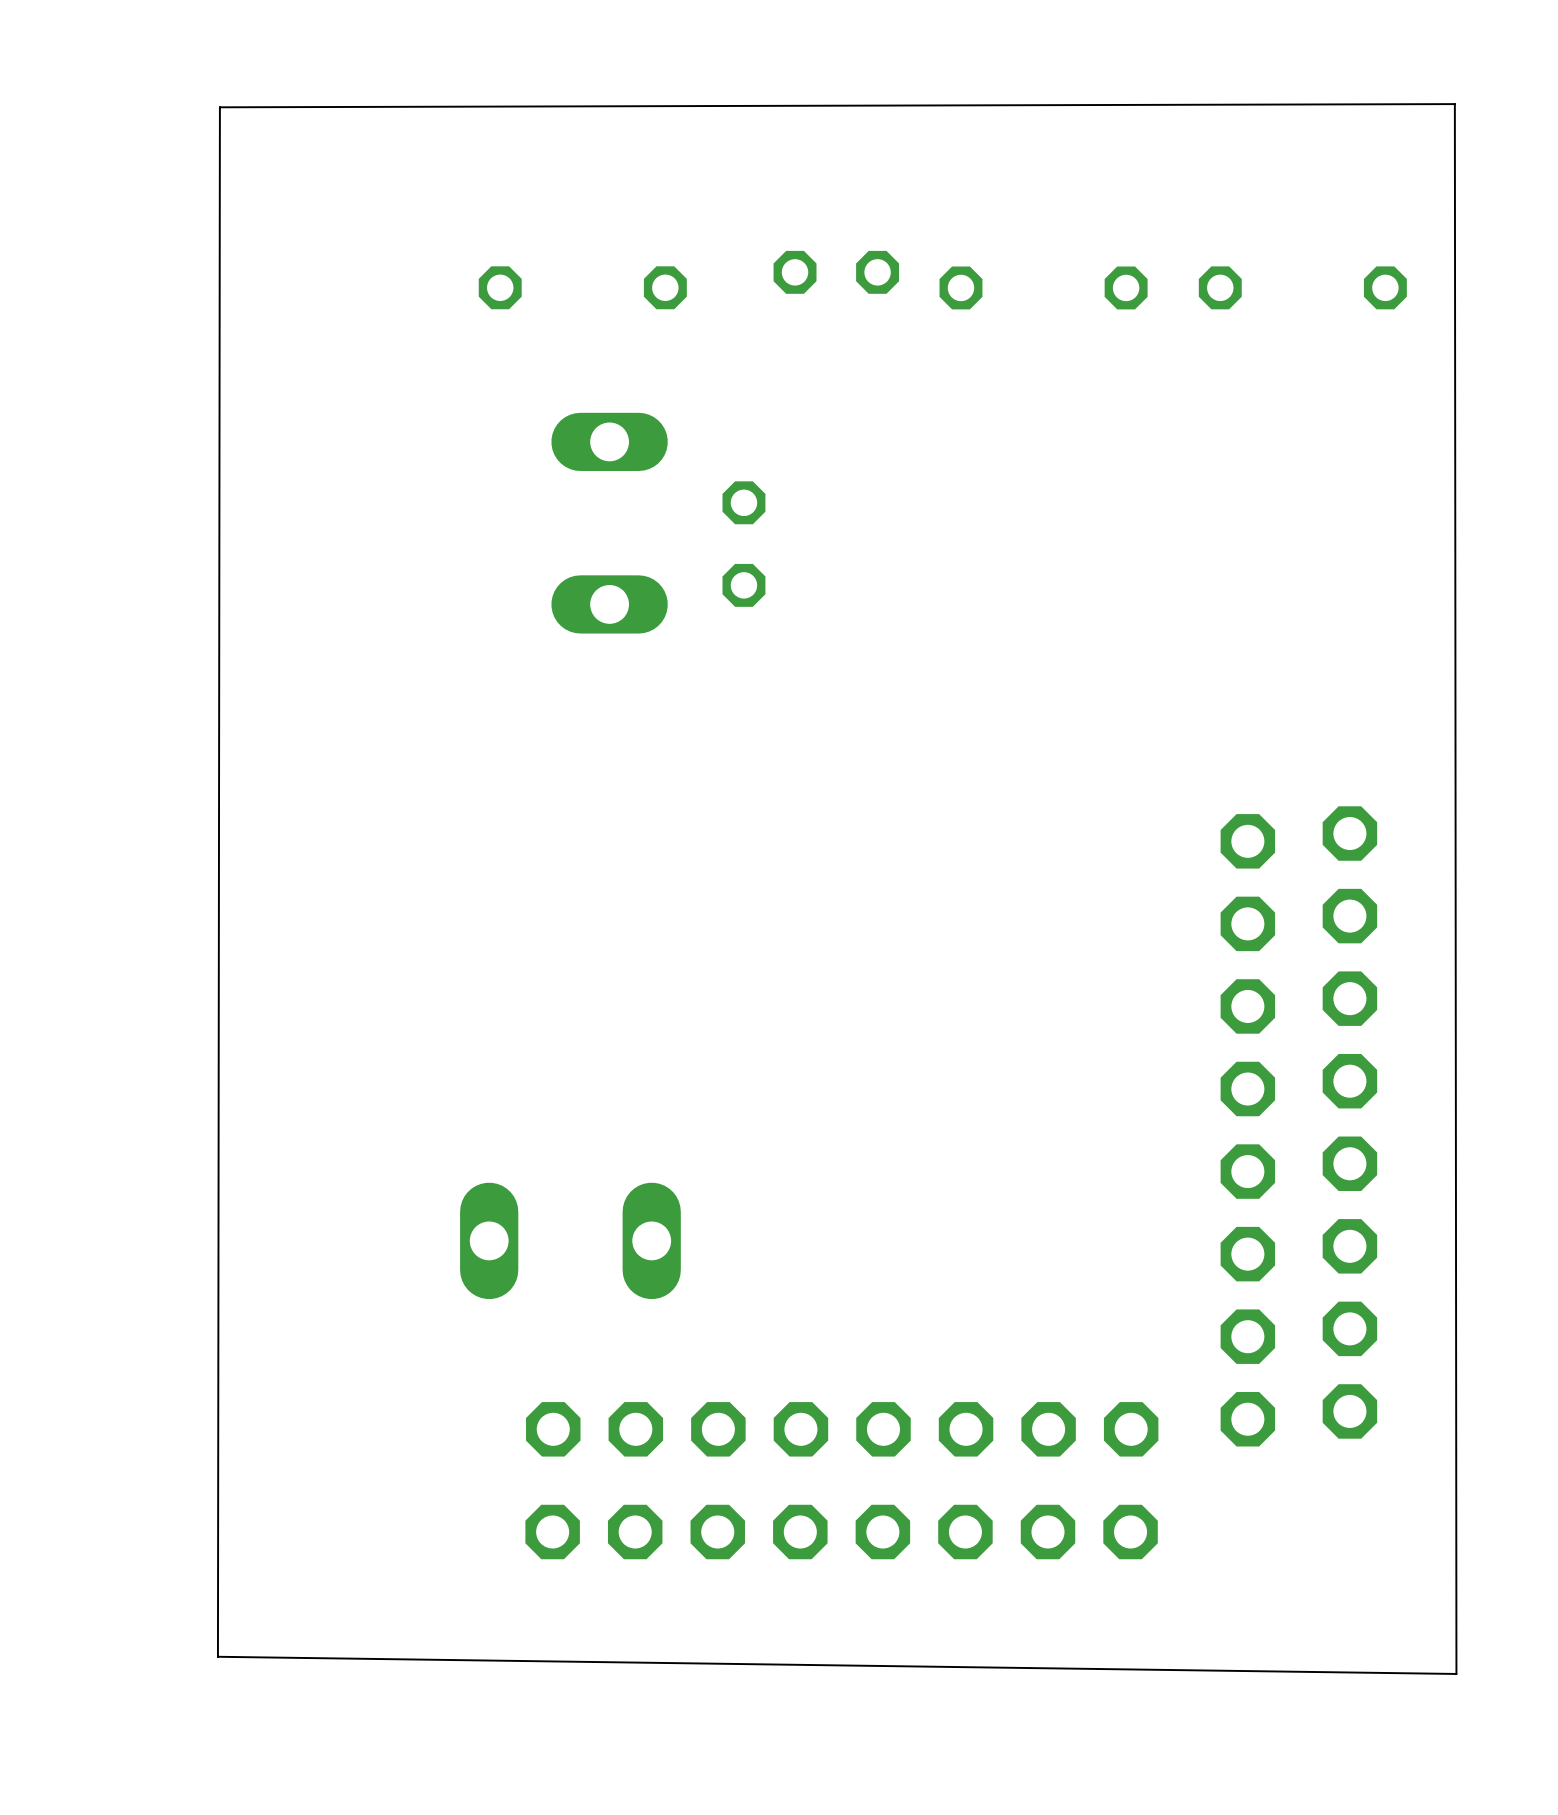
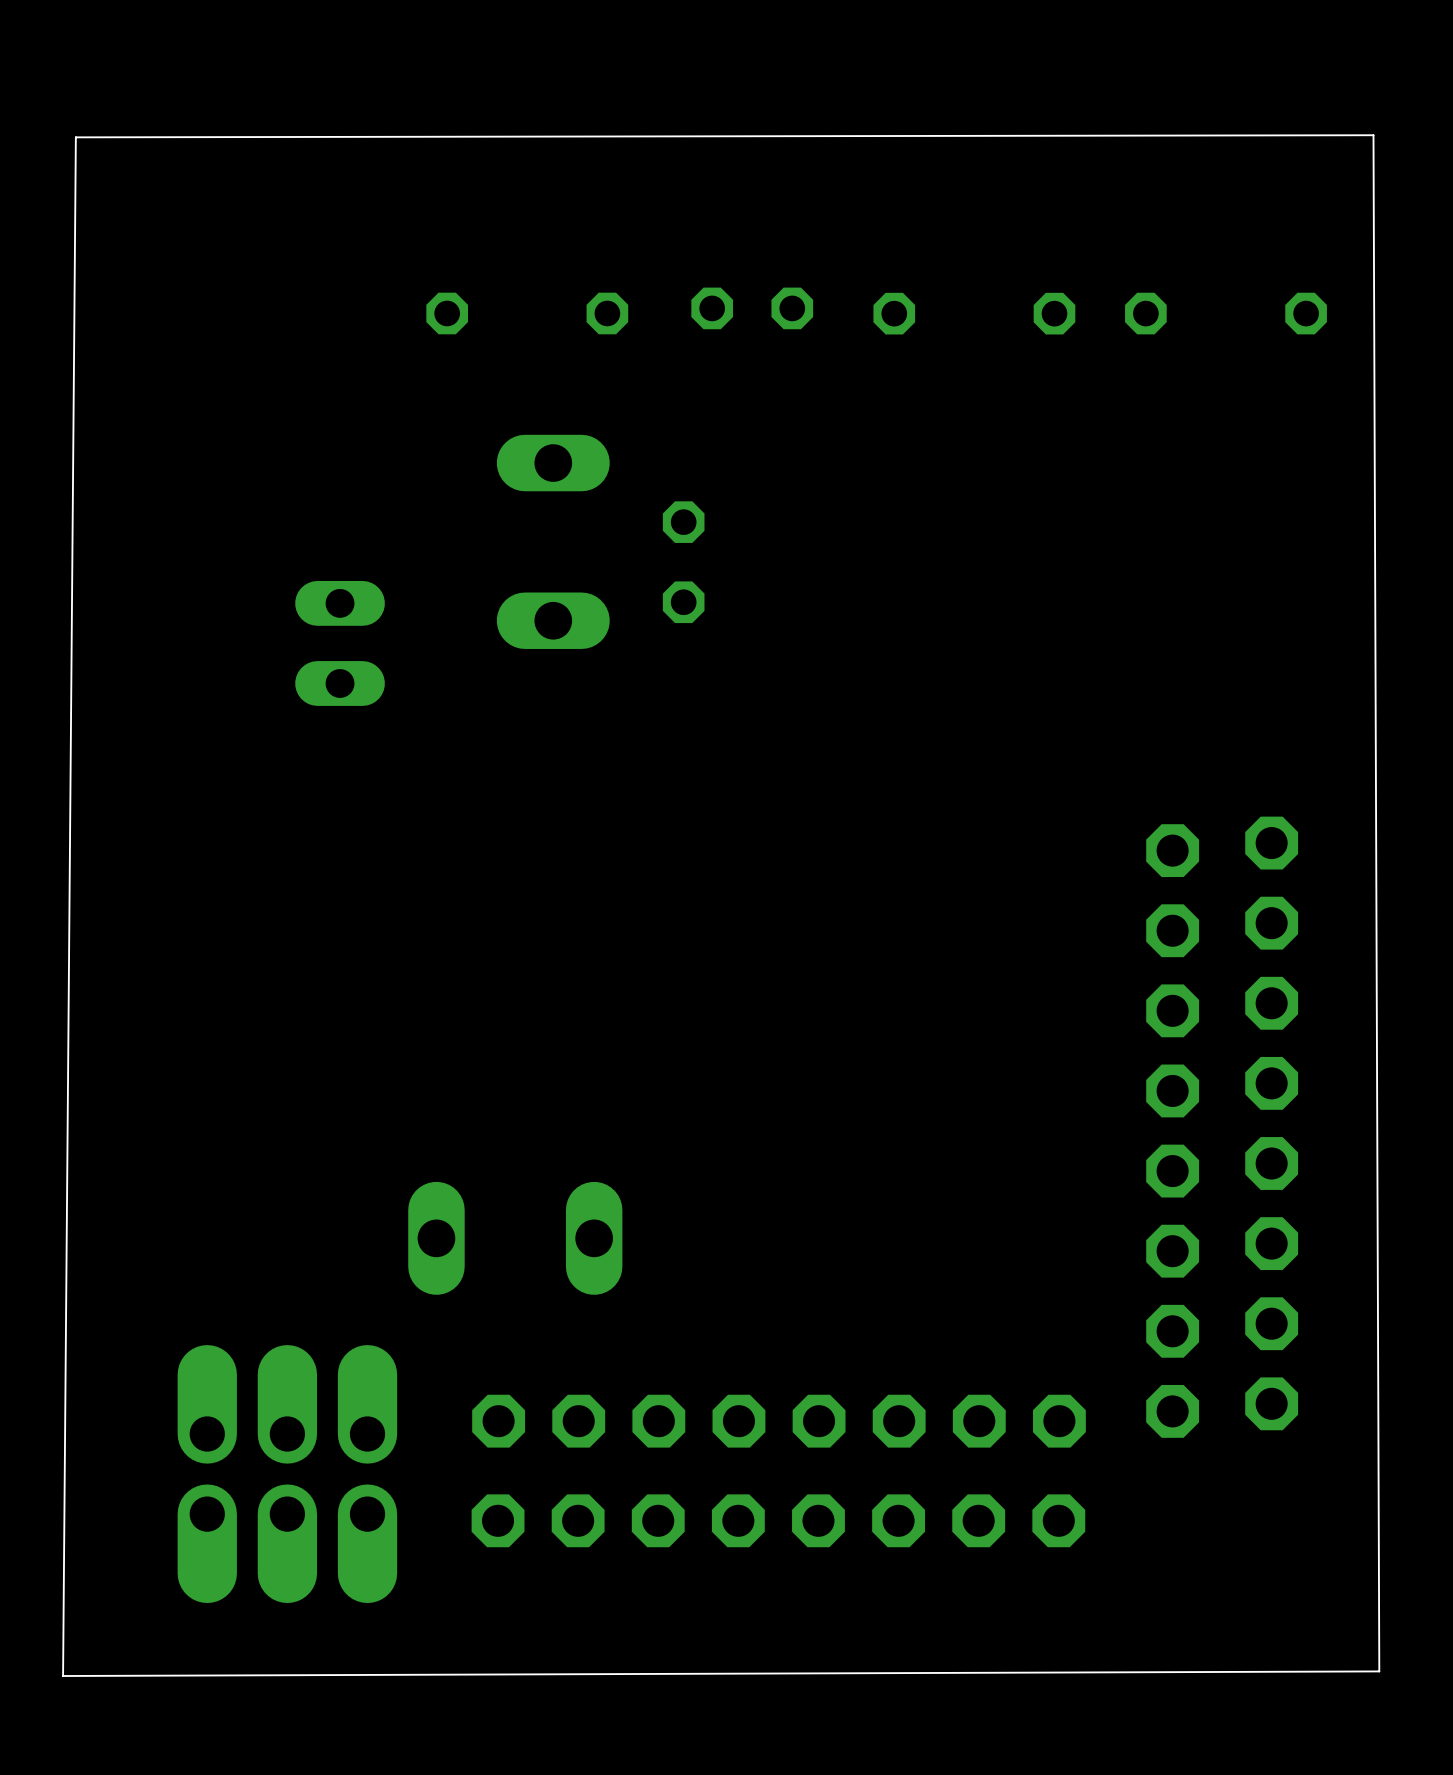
board edge: (1454, 104) (219, 107) (217, 1656) (1456, 1673) (1454, 104) -> (1373, 135) (1379, 1671) (63, 1676) (75, 137) (1373, 135)
part position: (836, 272) -> (752, 308)
part: none -> (340, 643)
part: none -> (287, 1474)

